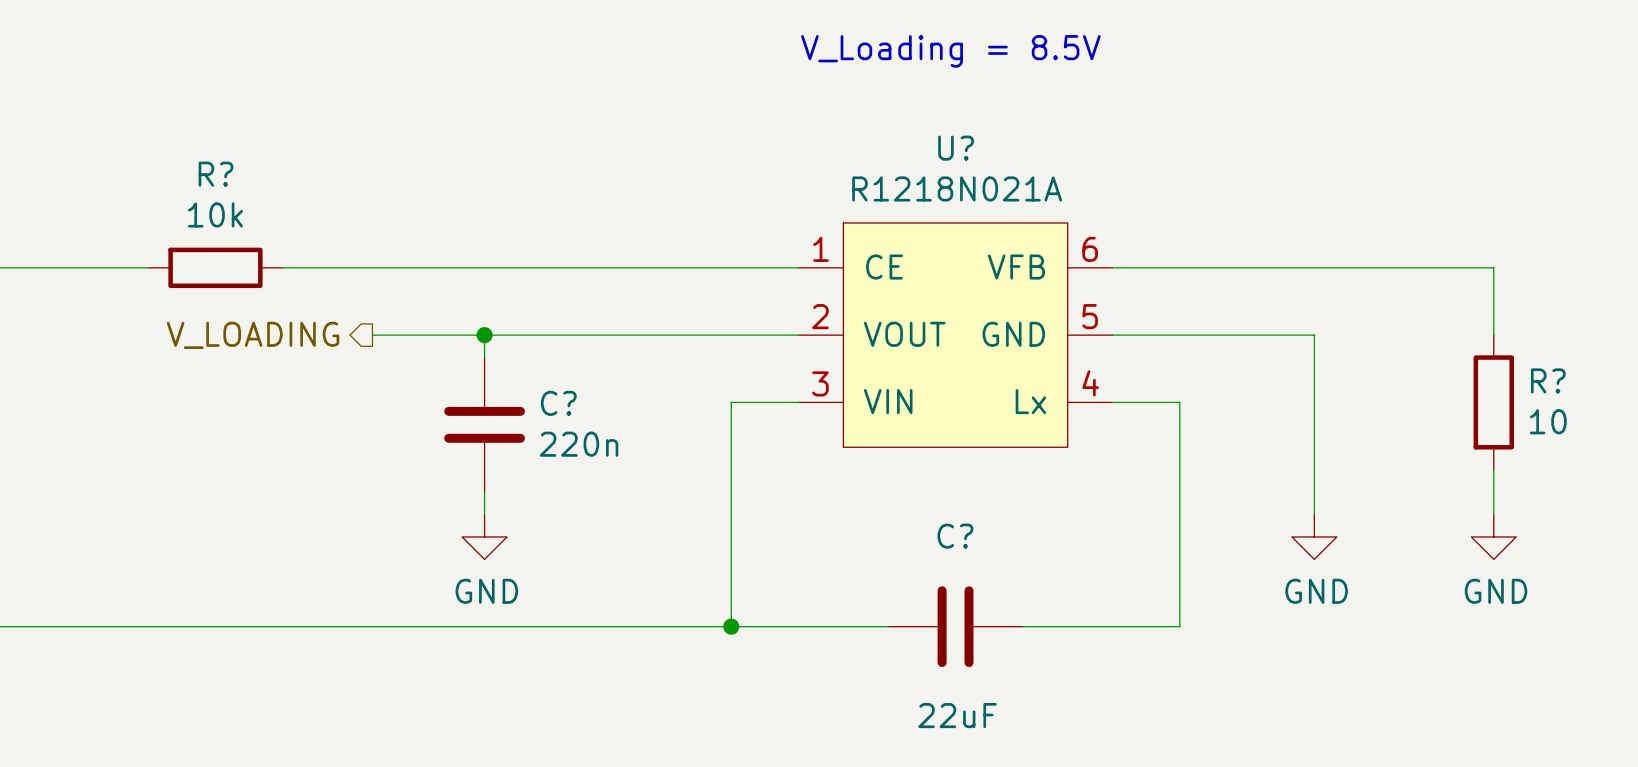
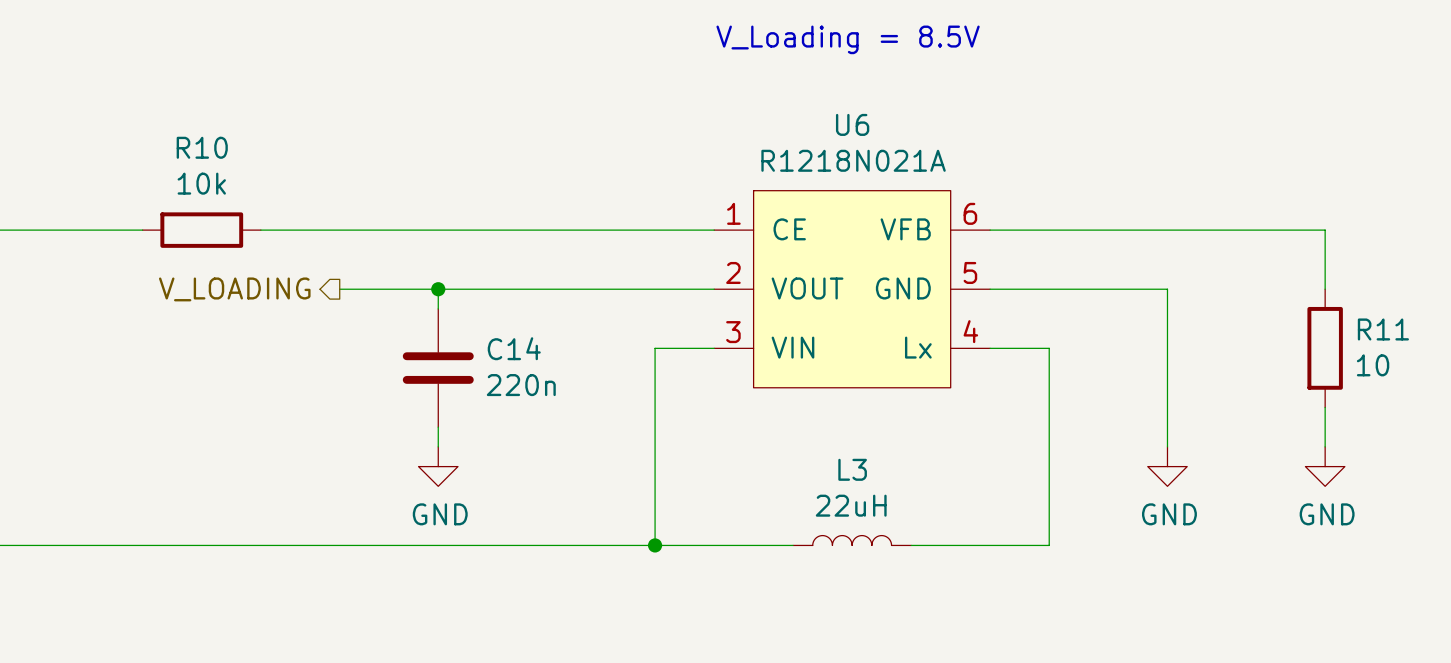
U? name: U? (956, 148) -> U6 (852, 124)
R? name: R? (216, 174) -> R10 (202, 147)
R? name: R? (1548, 380) -> R11 (1383, 329)
C? name: C? (558, 403) -> C14 (514, 348)
L3: none -> 22uH (852, 540)
C?: 22uF (955, 626) -> none

